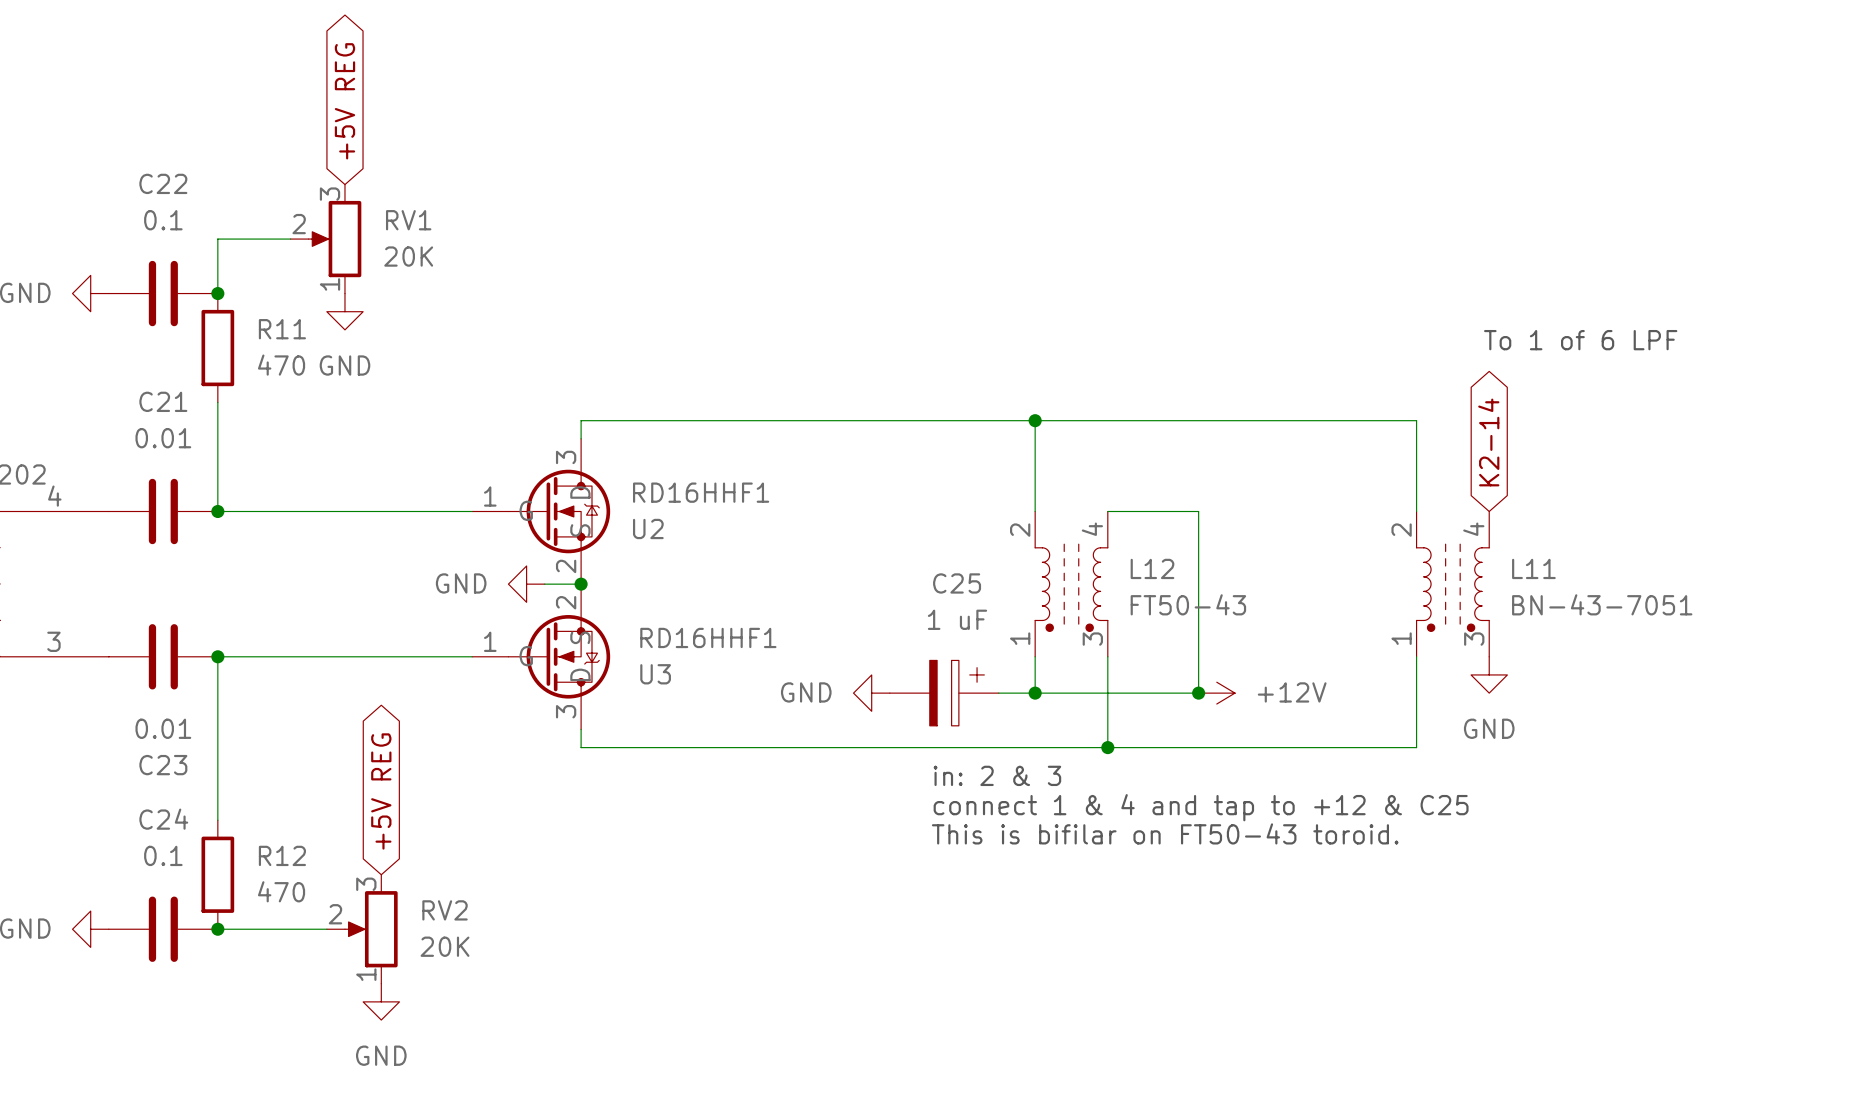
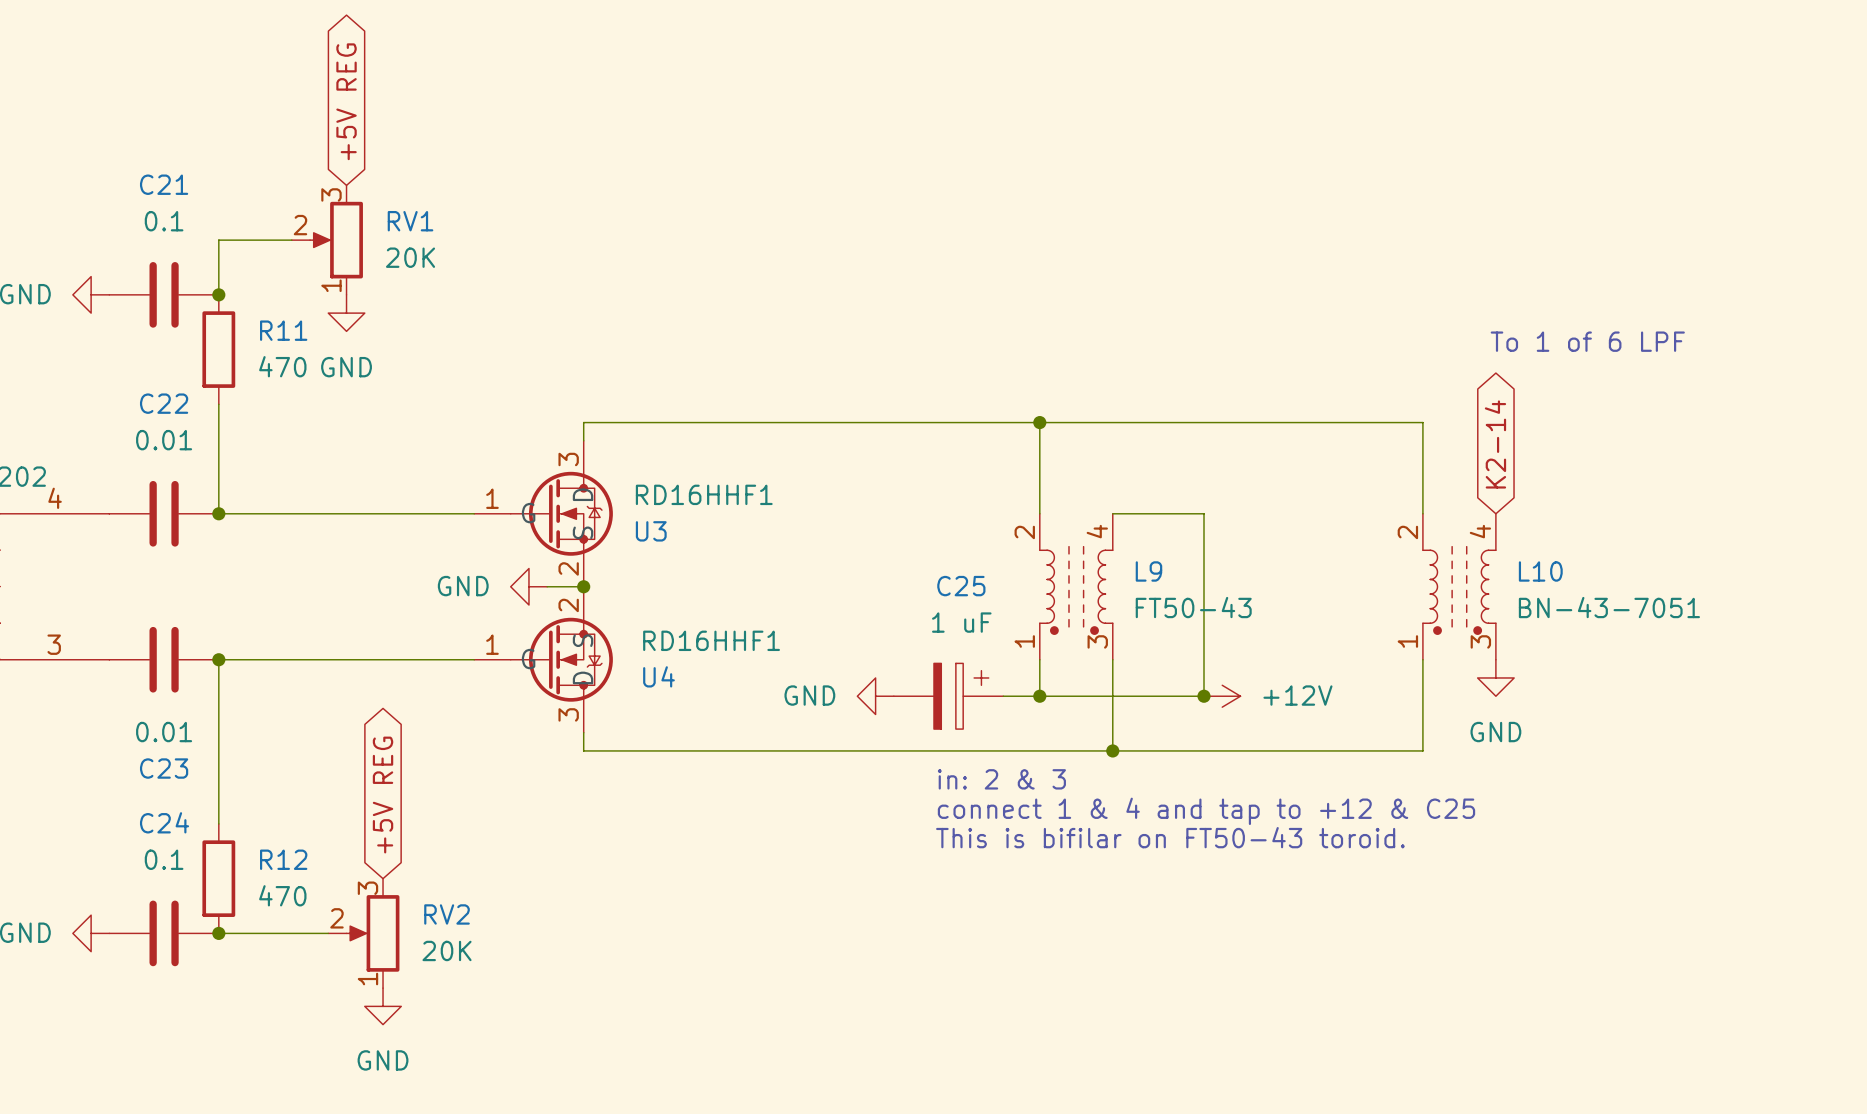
C22 name: C22 (163, 183) -> C21 (164, 184)
C21 name: C21 (163, 401) -> C22 (164, 403)
U2 name: U2 (648, 528) -> U3 (651, 531)
L12 name: L12 (1152, 568) -> L9 (1148, 571)
L11 name: L11 (1533, 568) -> L10 (1540, 571)
U3 name: U3 (655, 674) -> U4 (658, 676)

